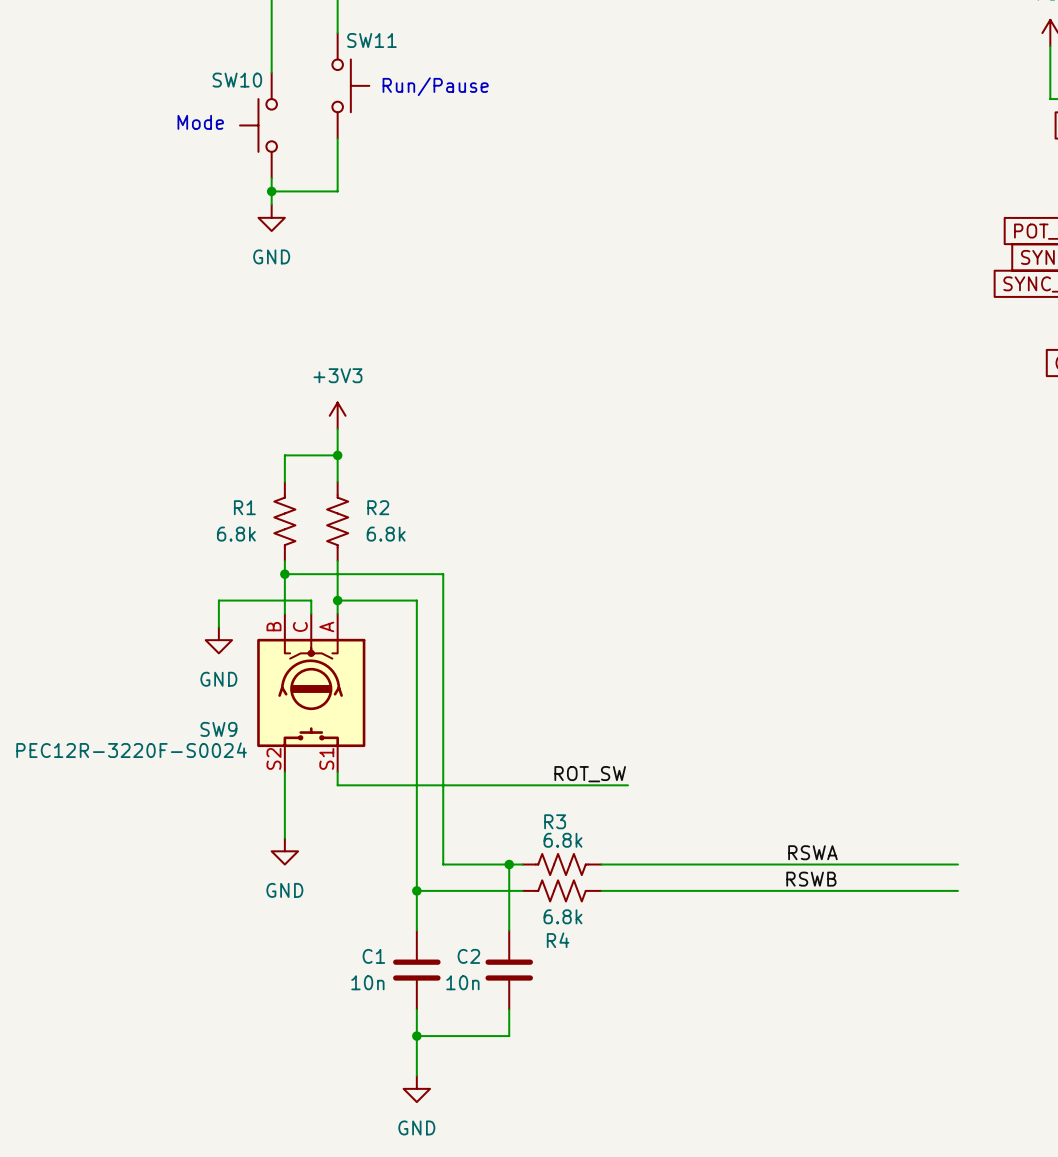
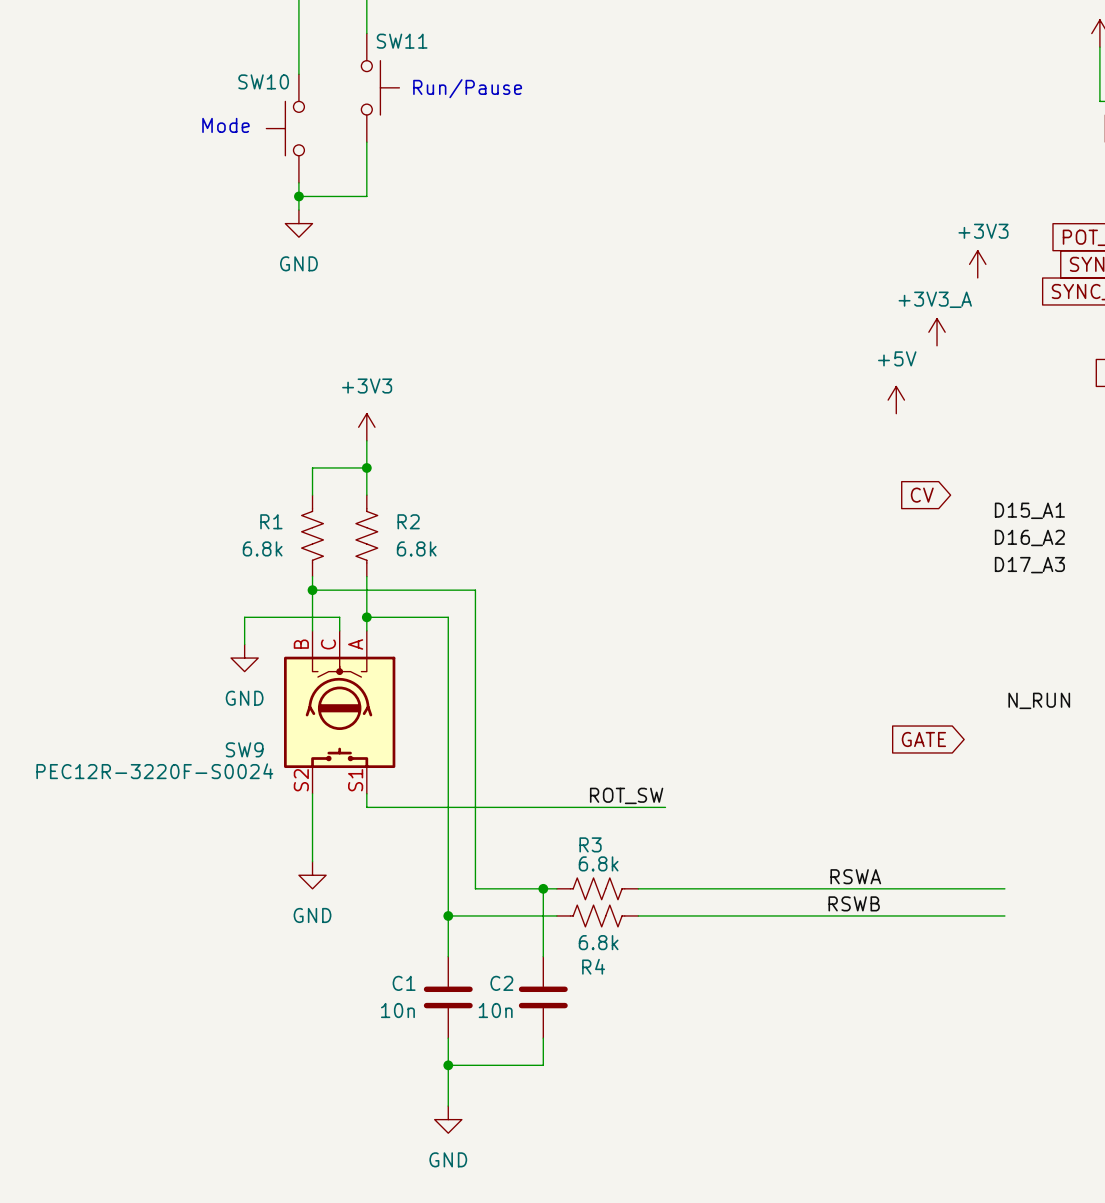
power symbol: none -> +3V3 (977, 264)
power symbol: none -> +3V3_A (937, 332)
power symbol: none -> +5V (896, 400)
global label: none -> CV (922, 495)
label: none -> D15_A1 (1029, 510)
label: none -> D16_A2 (1029, 537)
label: none -> D17_A3 (1029, 565)
label: none -> N_RUN (1039, 700)
global label: none -> GATE (923, 739)

